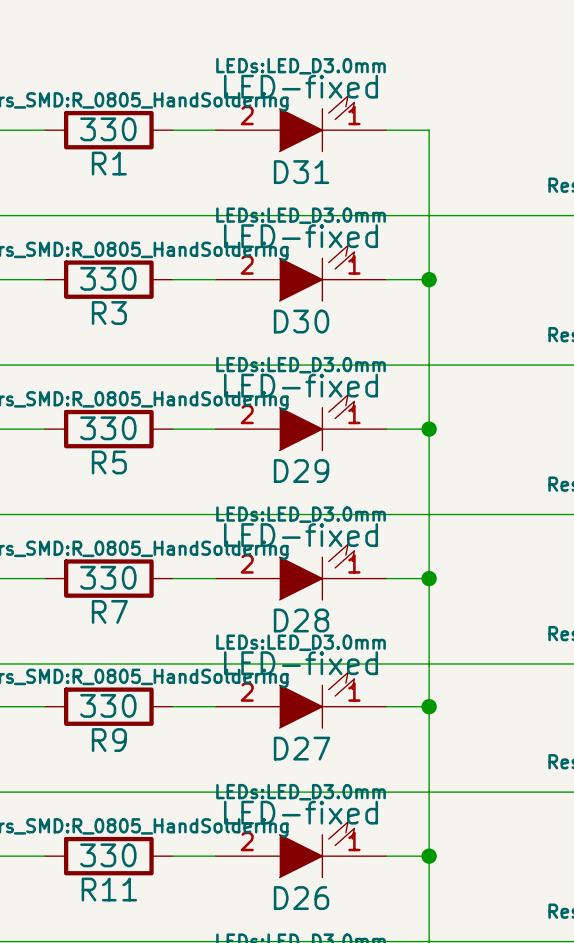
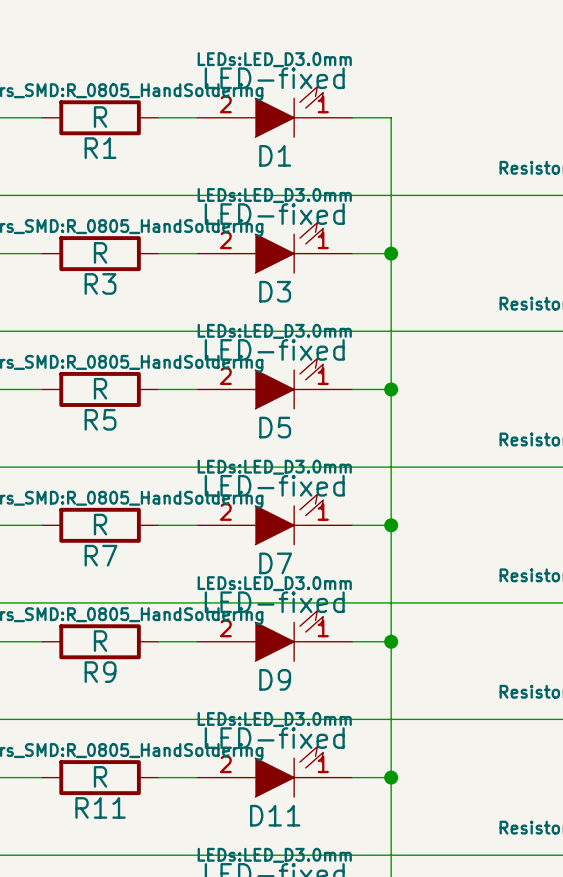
R1 value: 330 (108, 129) -> R (100, 117)
D31 name: D31 (301, 172) -> D1 (275, 155)
R3 value: 330 (108, 278) -> R (100, 252)
D30 name: D30 (301, 321) -> D3 (275, 291)
R5 value: 330 (108, 428) -> R (100, 388)
D29 name: D29 (301, 471) -> D5 (275, 427)
R7 value: 330 (108, 577) -> R (100, 524)
D28 name: D28 (301, 620) -> D7 (275, 563)
R9 value: 330 (108, 705) -> R (100, 641)
D27 name: D27 (302, 748) -> D9 (275, 679)
R11 value: 330 (108, 855) -> R (100, 776)
D26 name: D26 (301, 898) -> D11 (275, 815)

